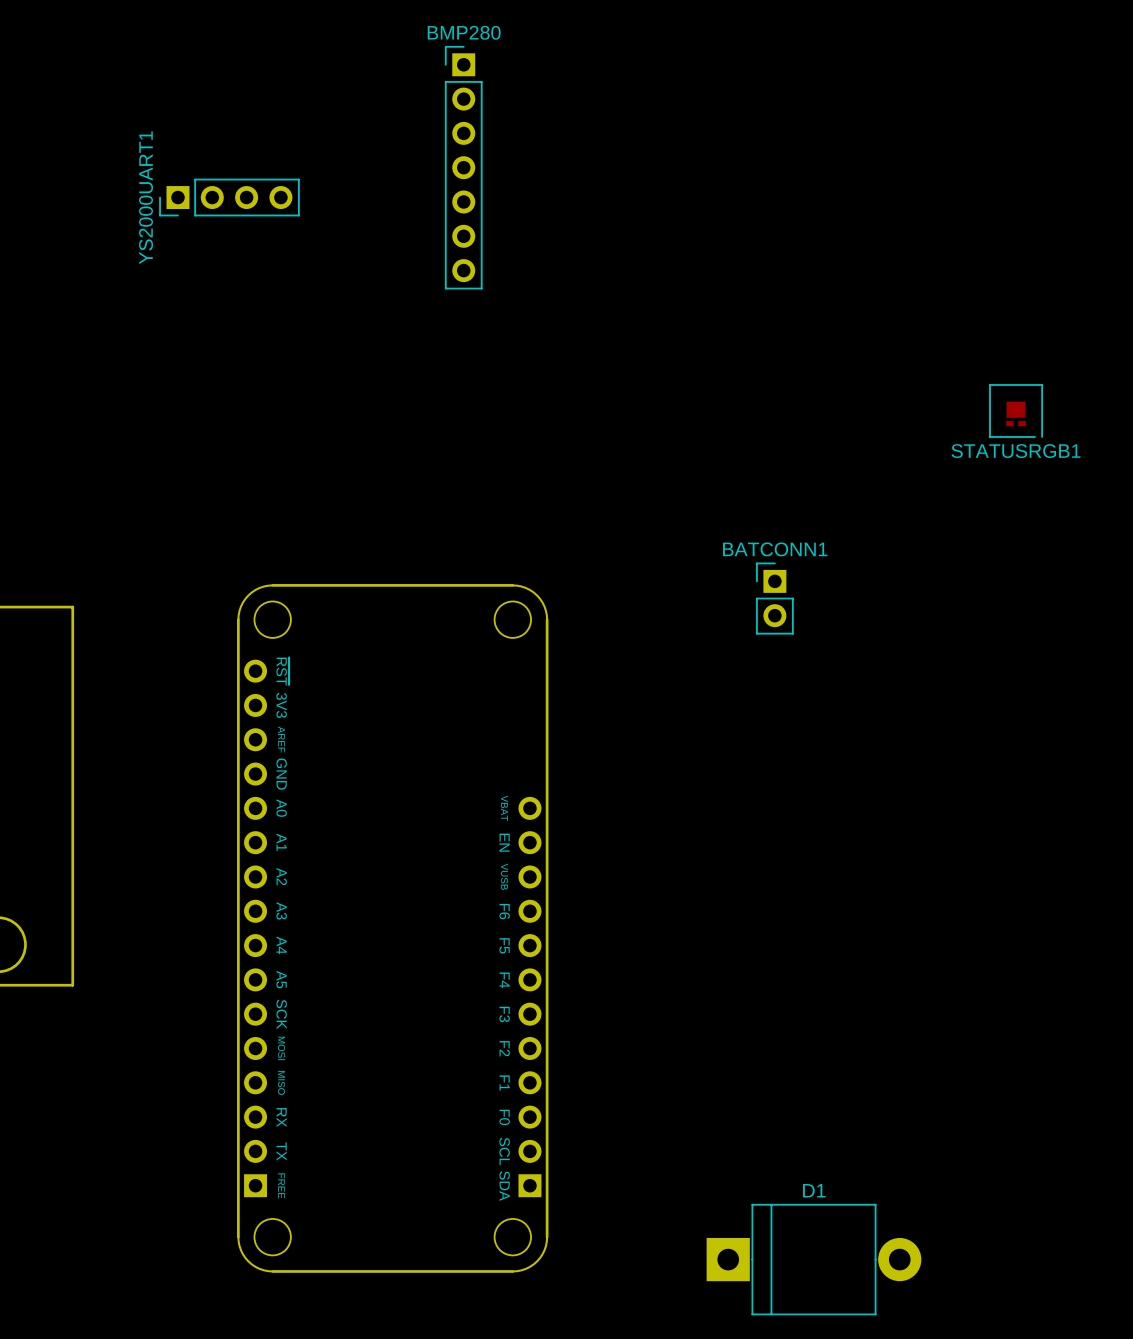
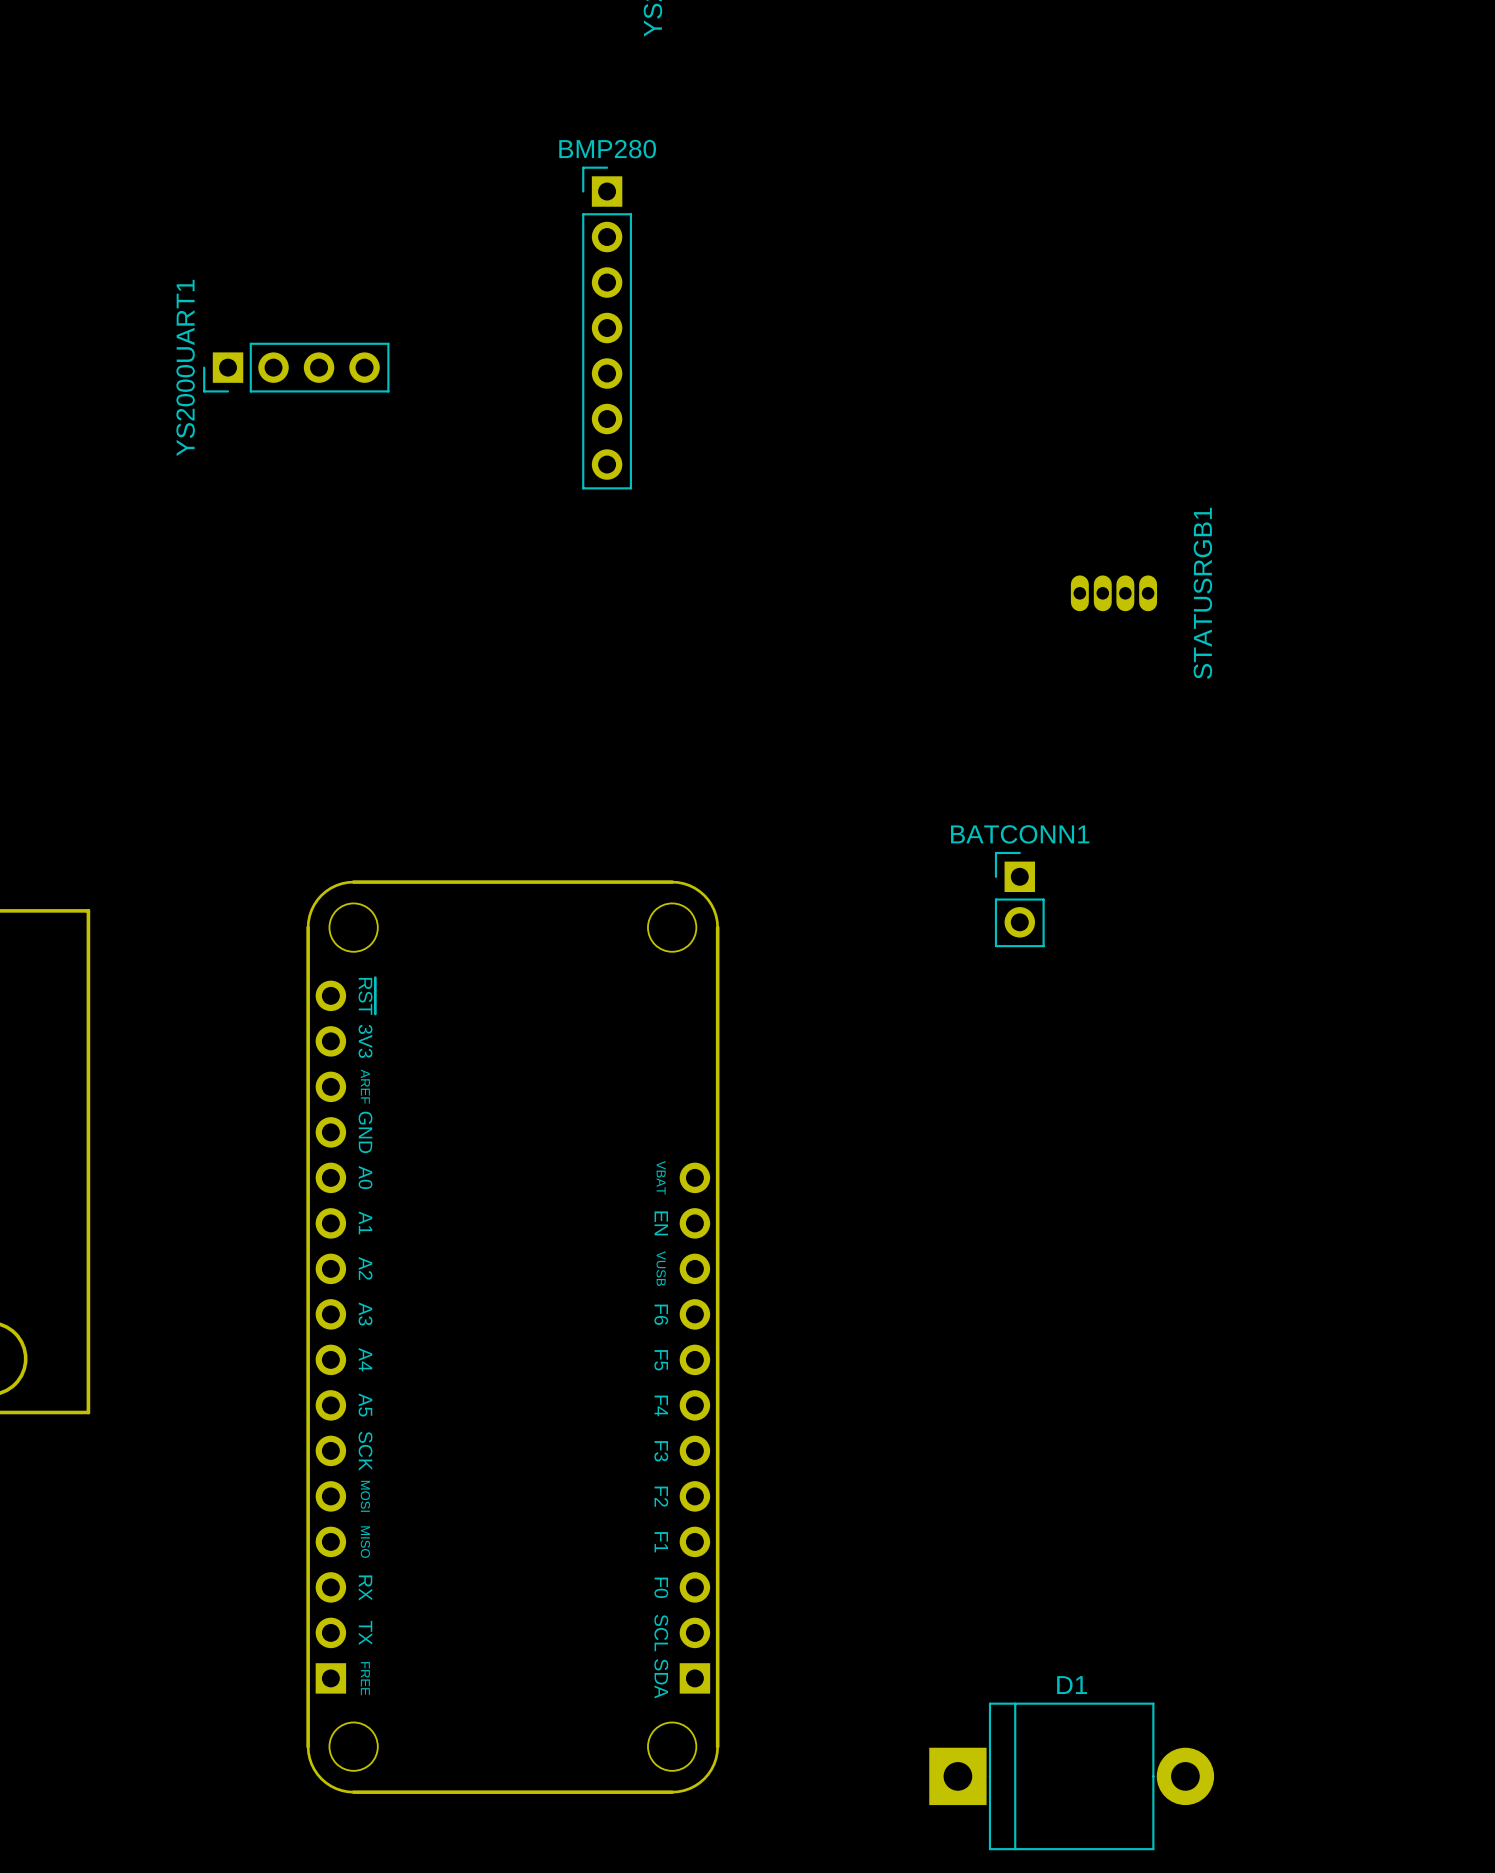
STATUSRGB1 footprint: [989, 384, 1043, 438] -> [1070, 575, 1158, 612]
STATUSRGB1 name position: STATUSRGB1 (1016, 451) -> STATUSRGB1 (1202, 593)

